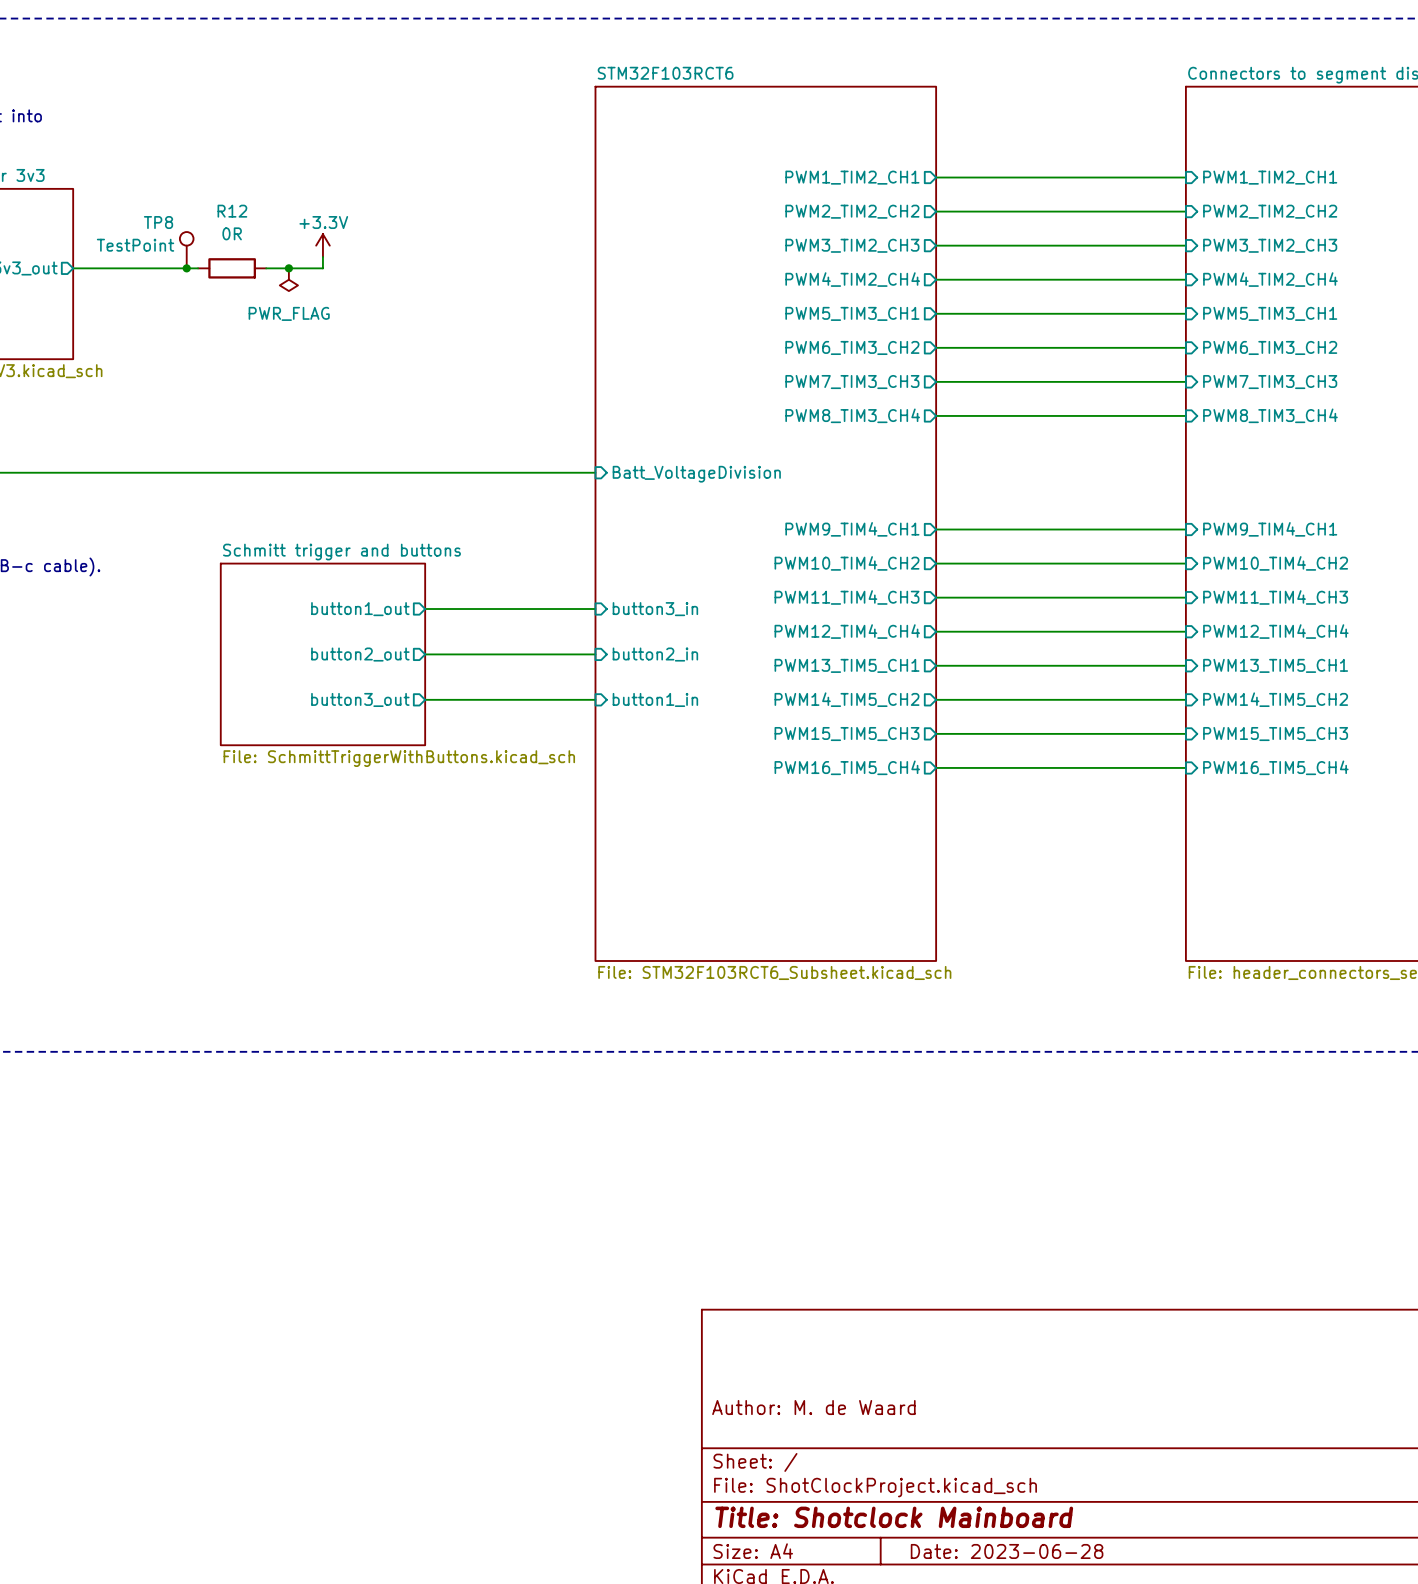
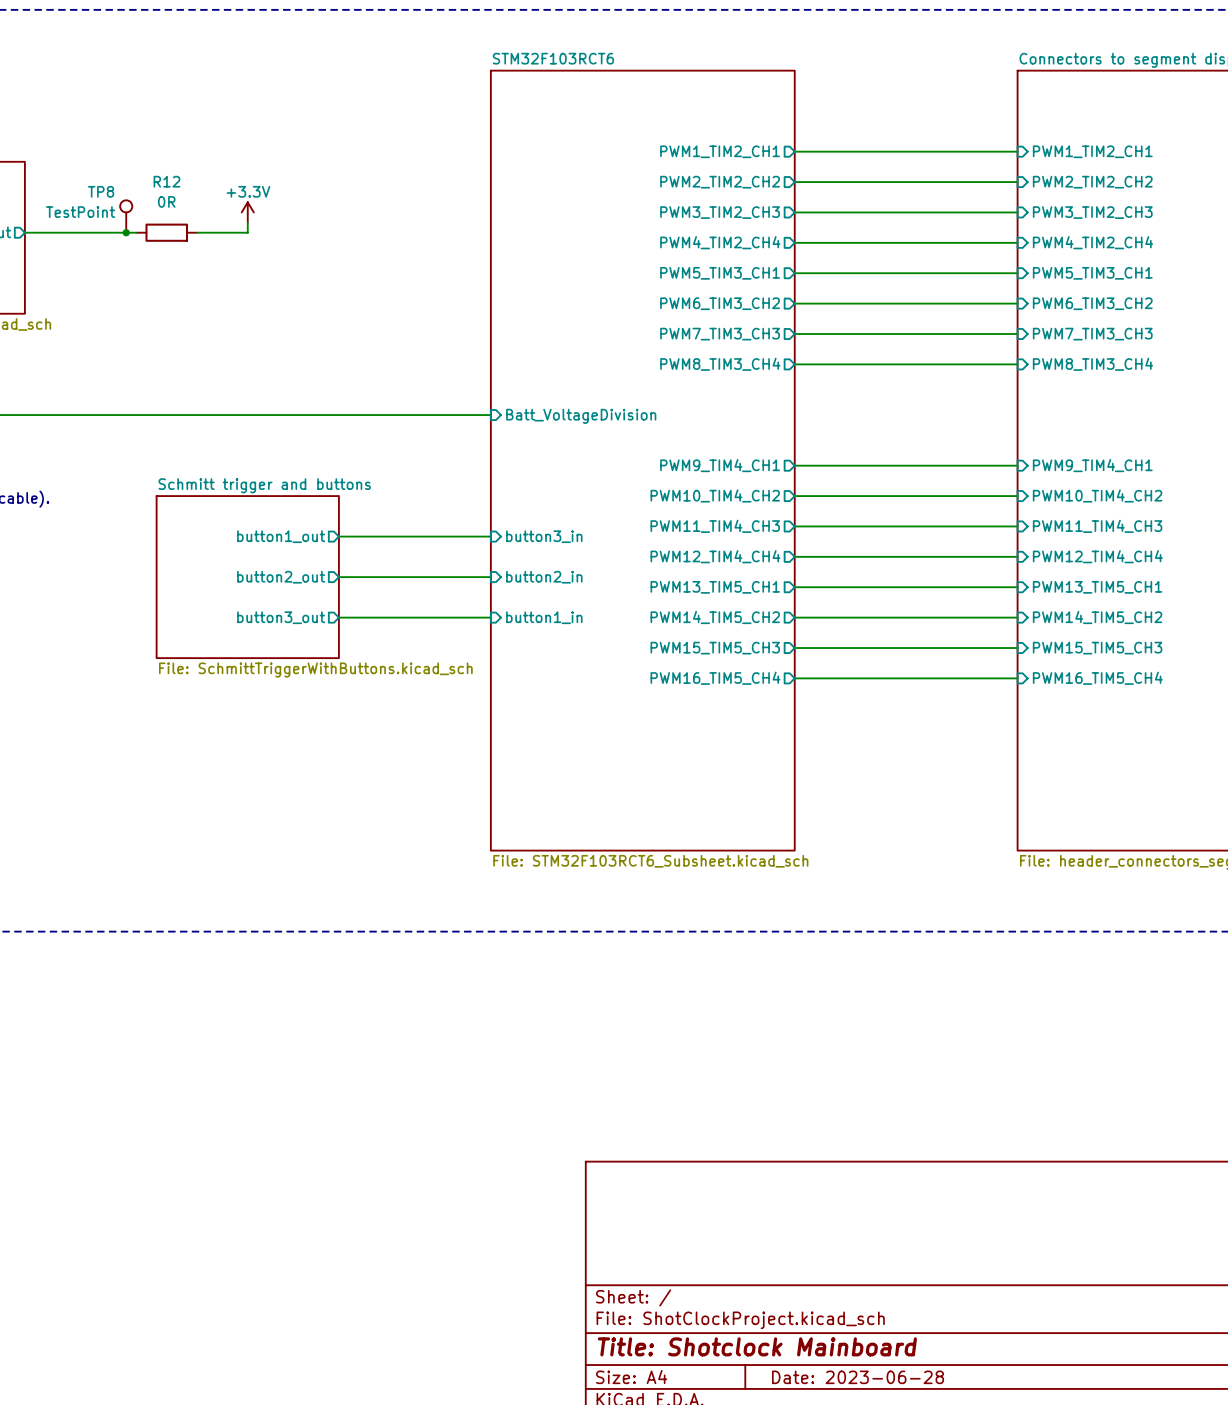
junction: (288, 268) -> none
power symbol: PWR_FLAG (288, 279) -> none
title block: Author: M. de Waard (813, 1407) -> none

